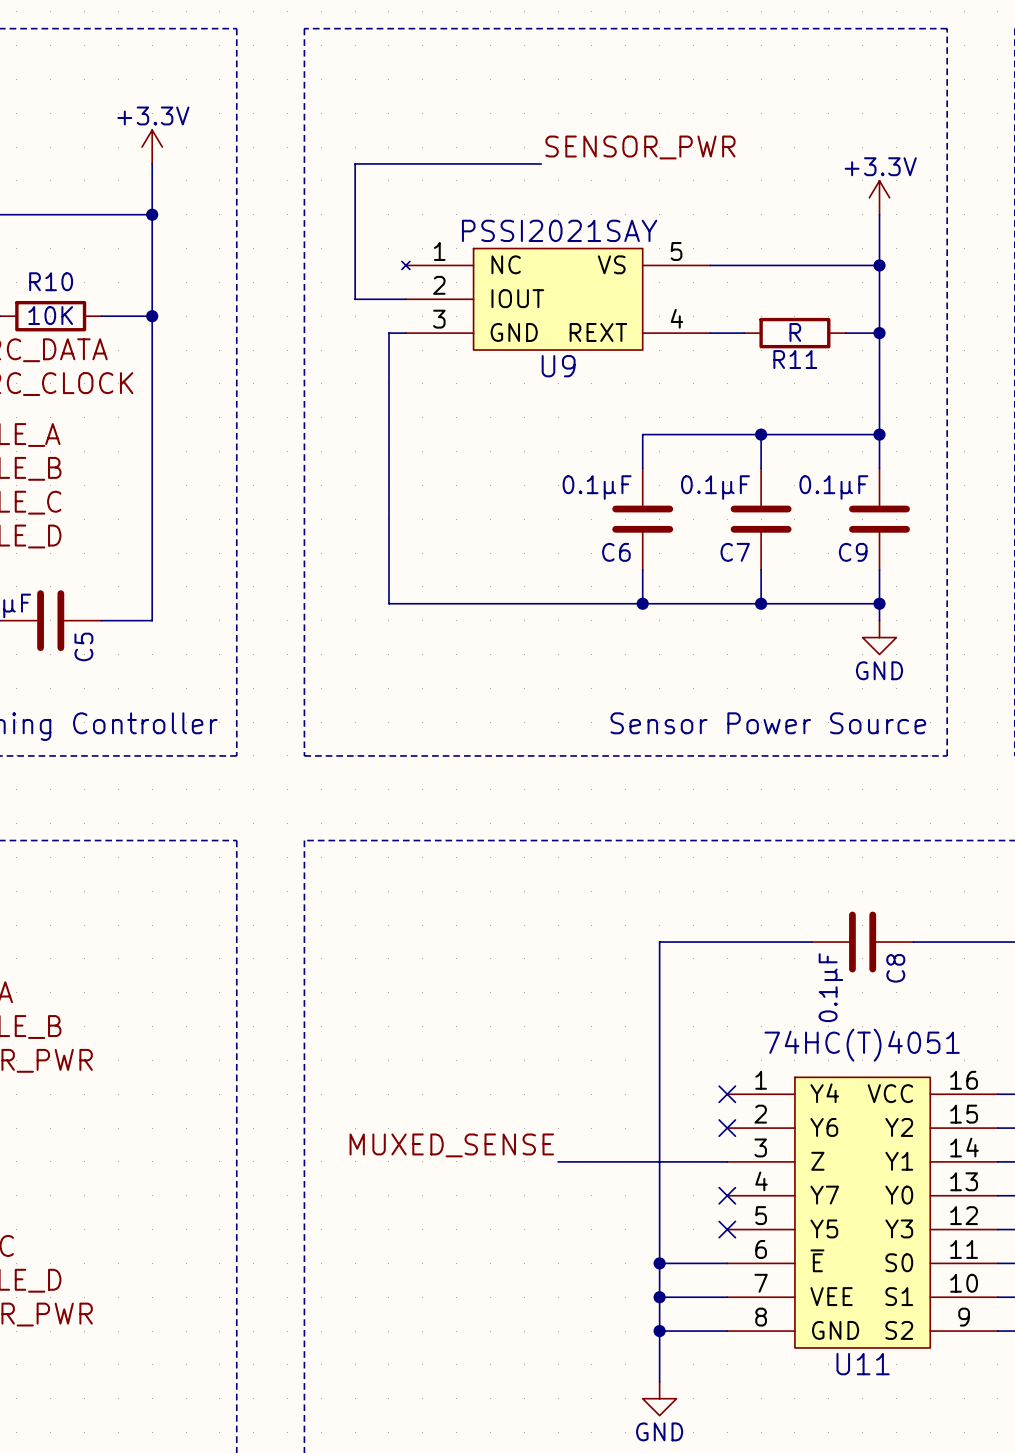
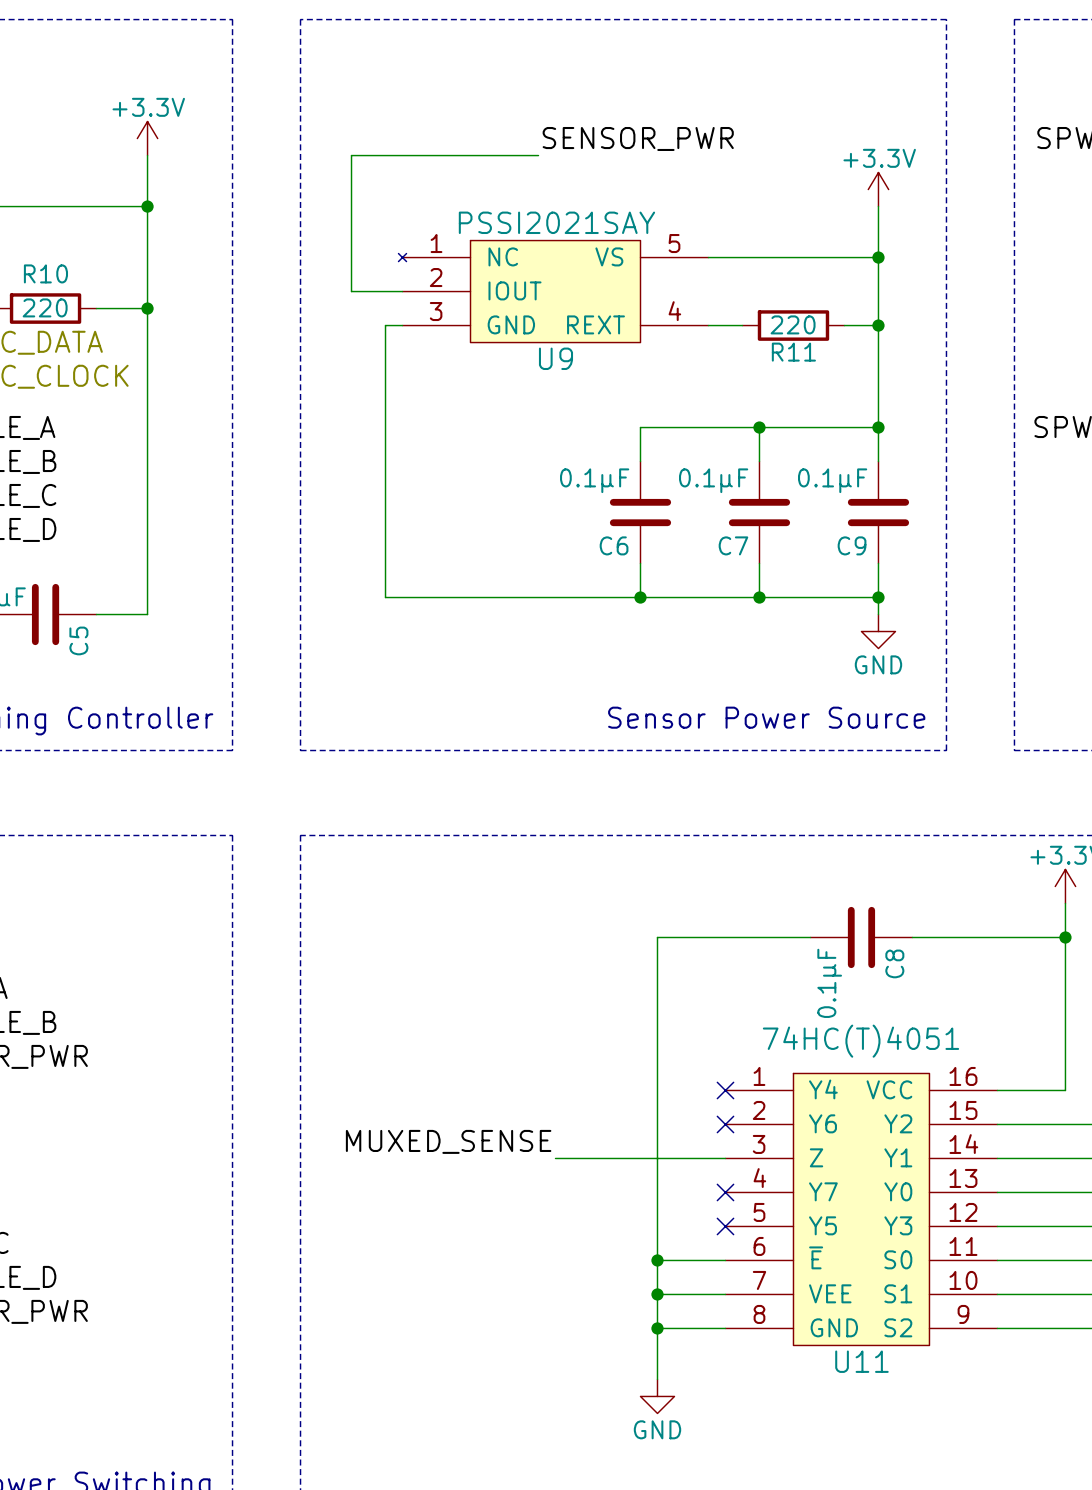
R10 value: 10K (50, 315) -> 220 (45, 307)
R11 value: R (795, 332) -> 220 (793, 324)

